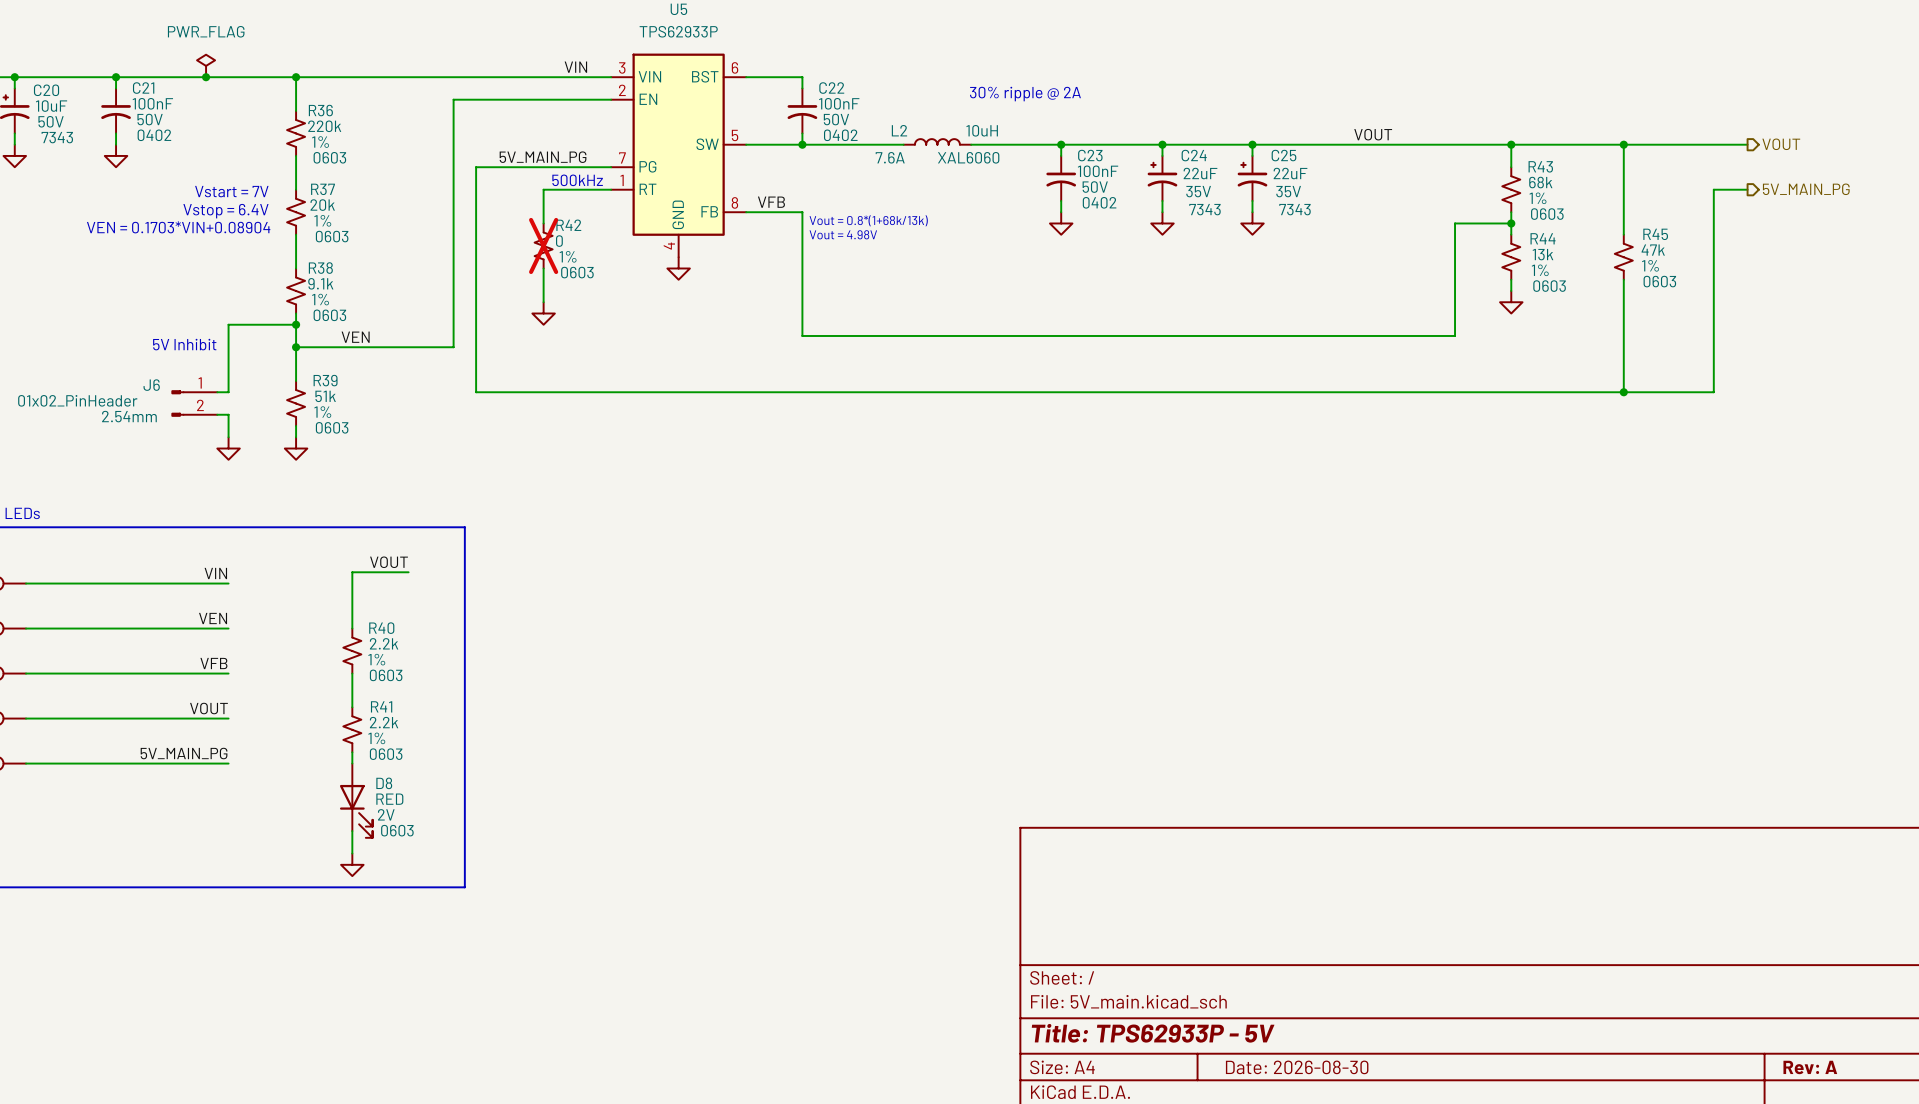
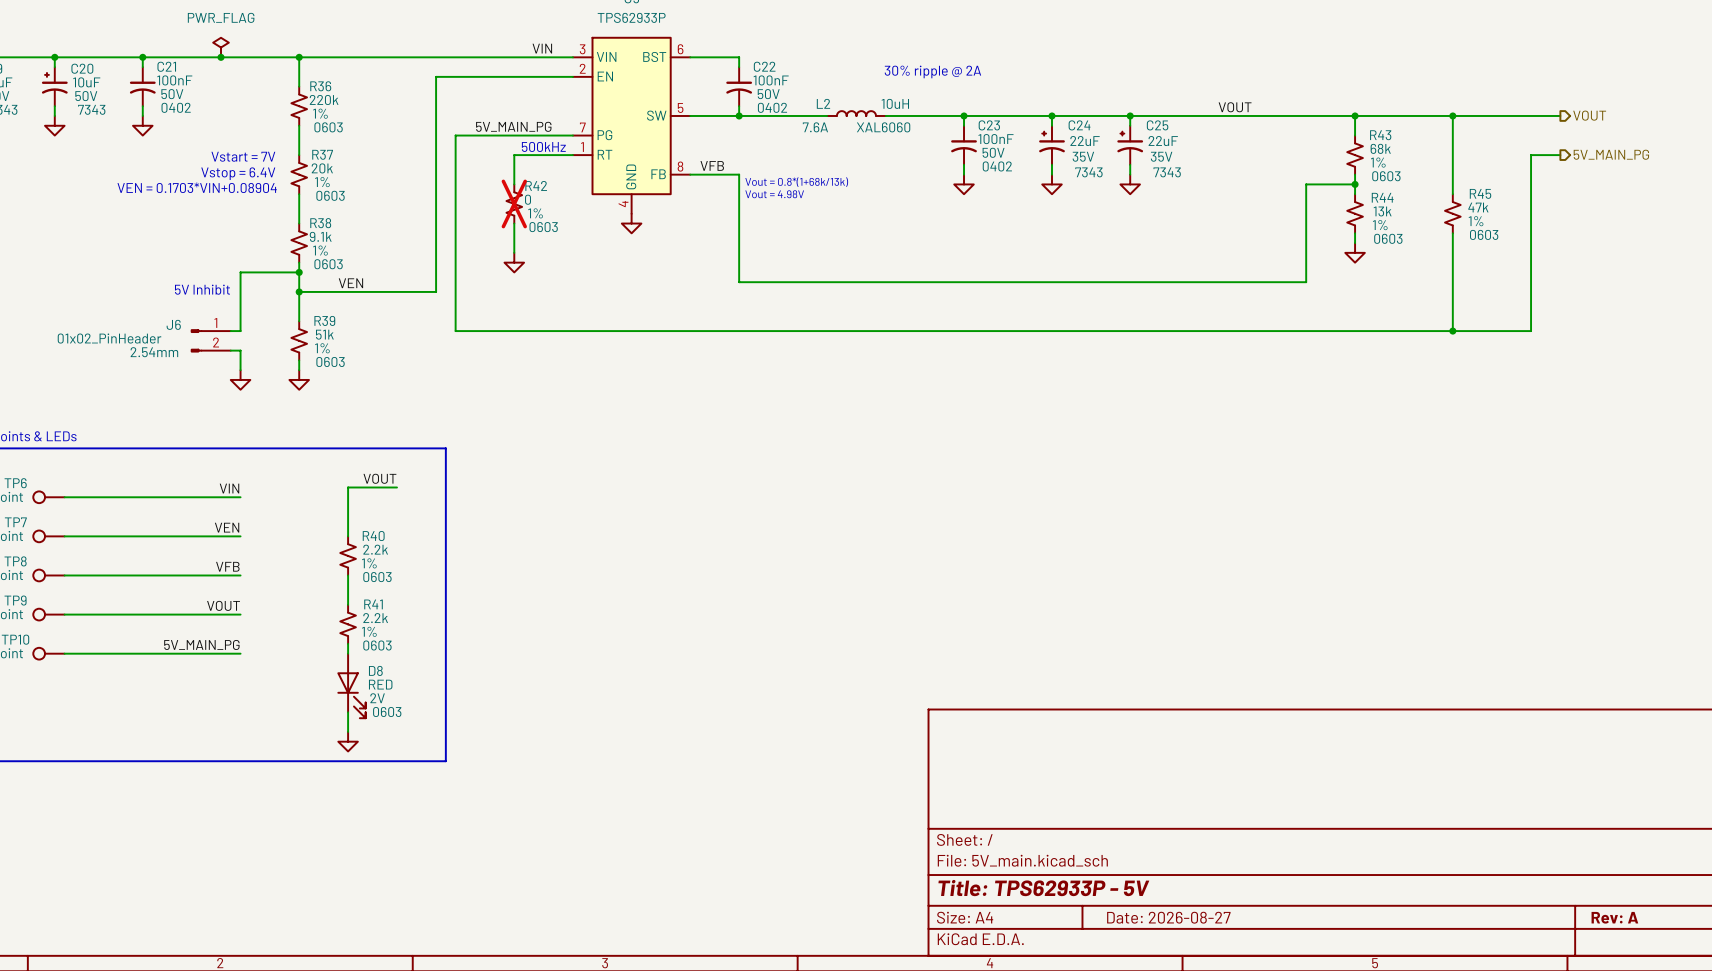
title block: Date: 2026-08-30 (1297, 1067) -> Date: 2026-08-27 (1168, 917)

